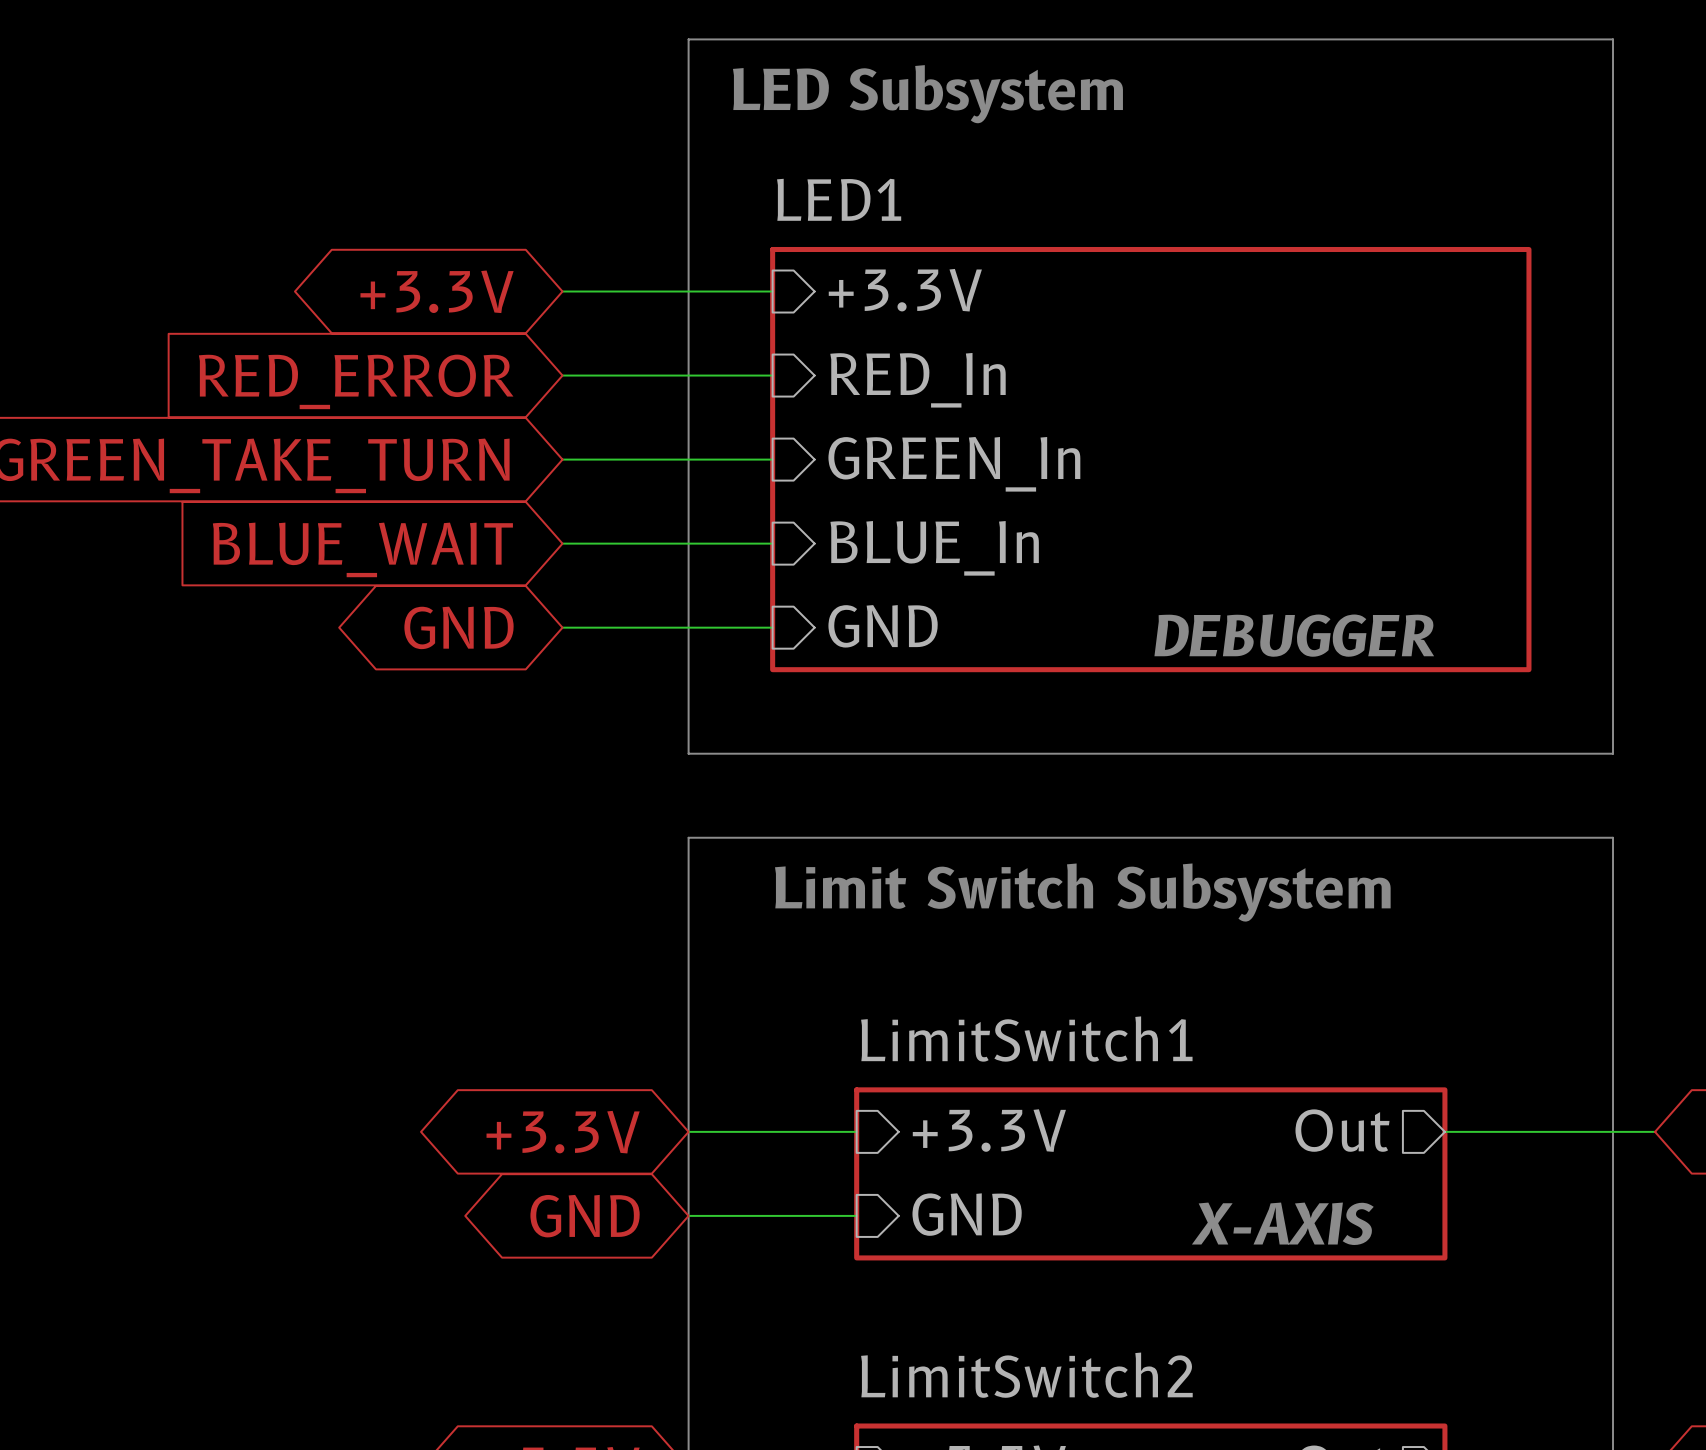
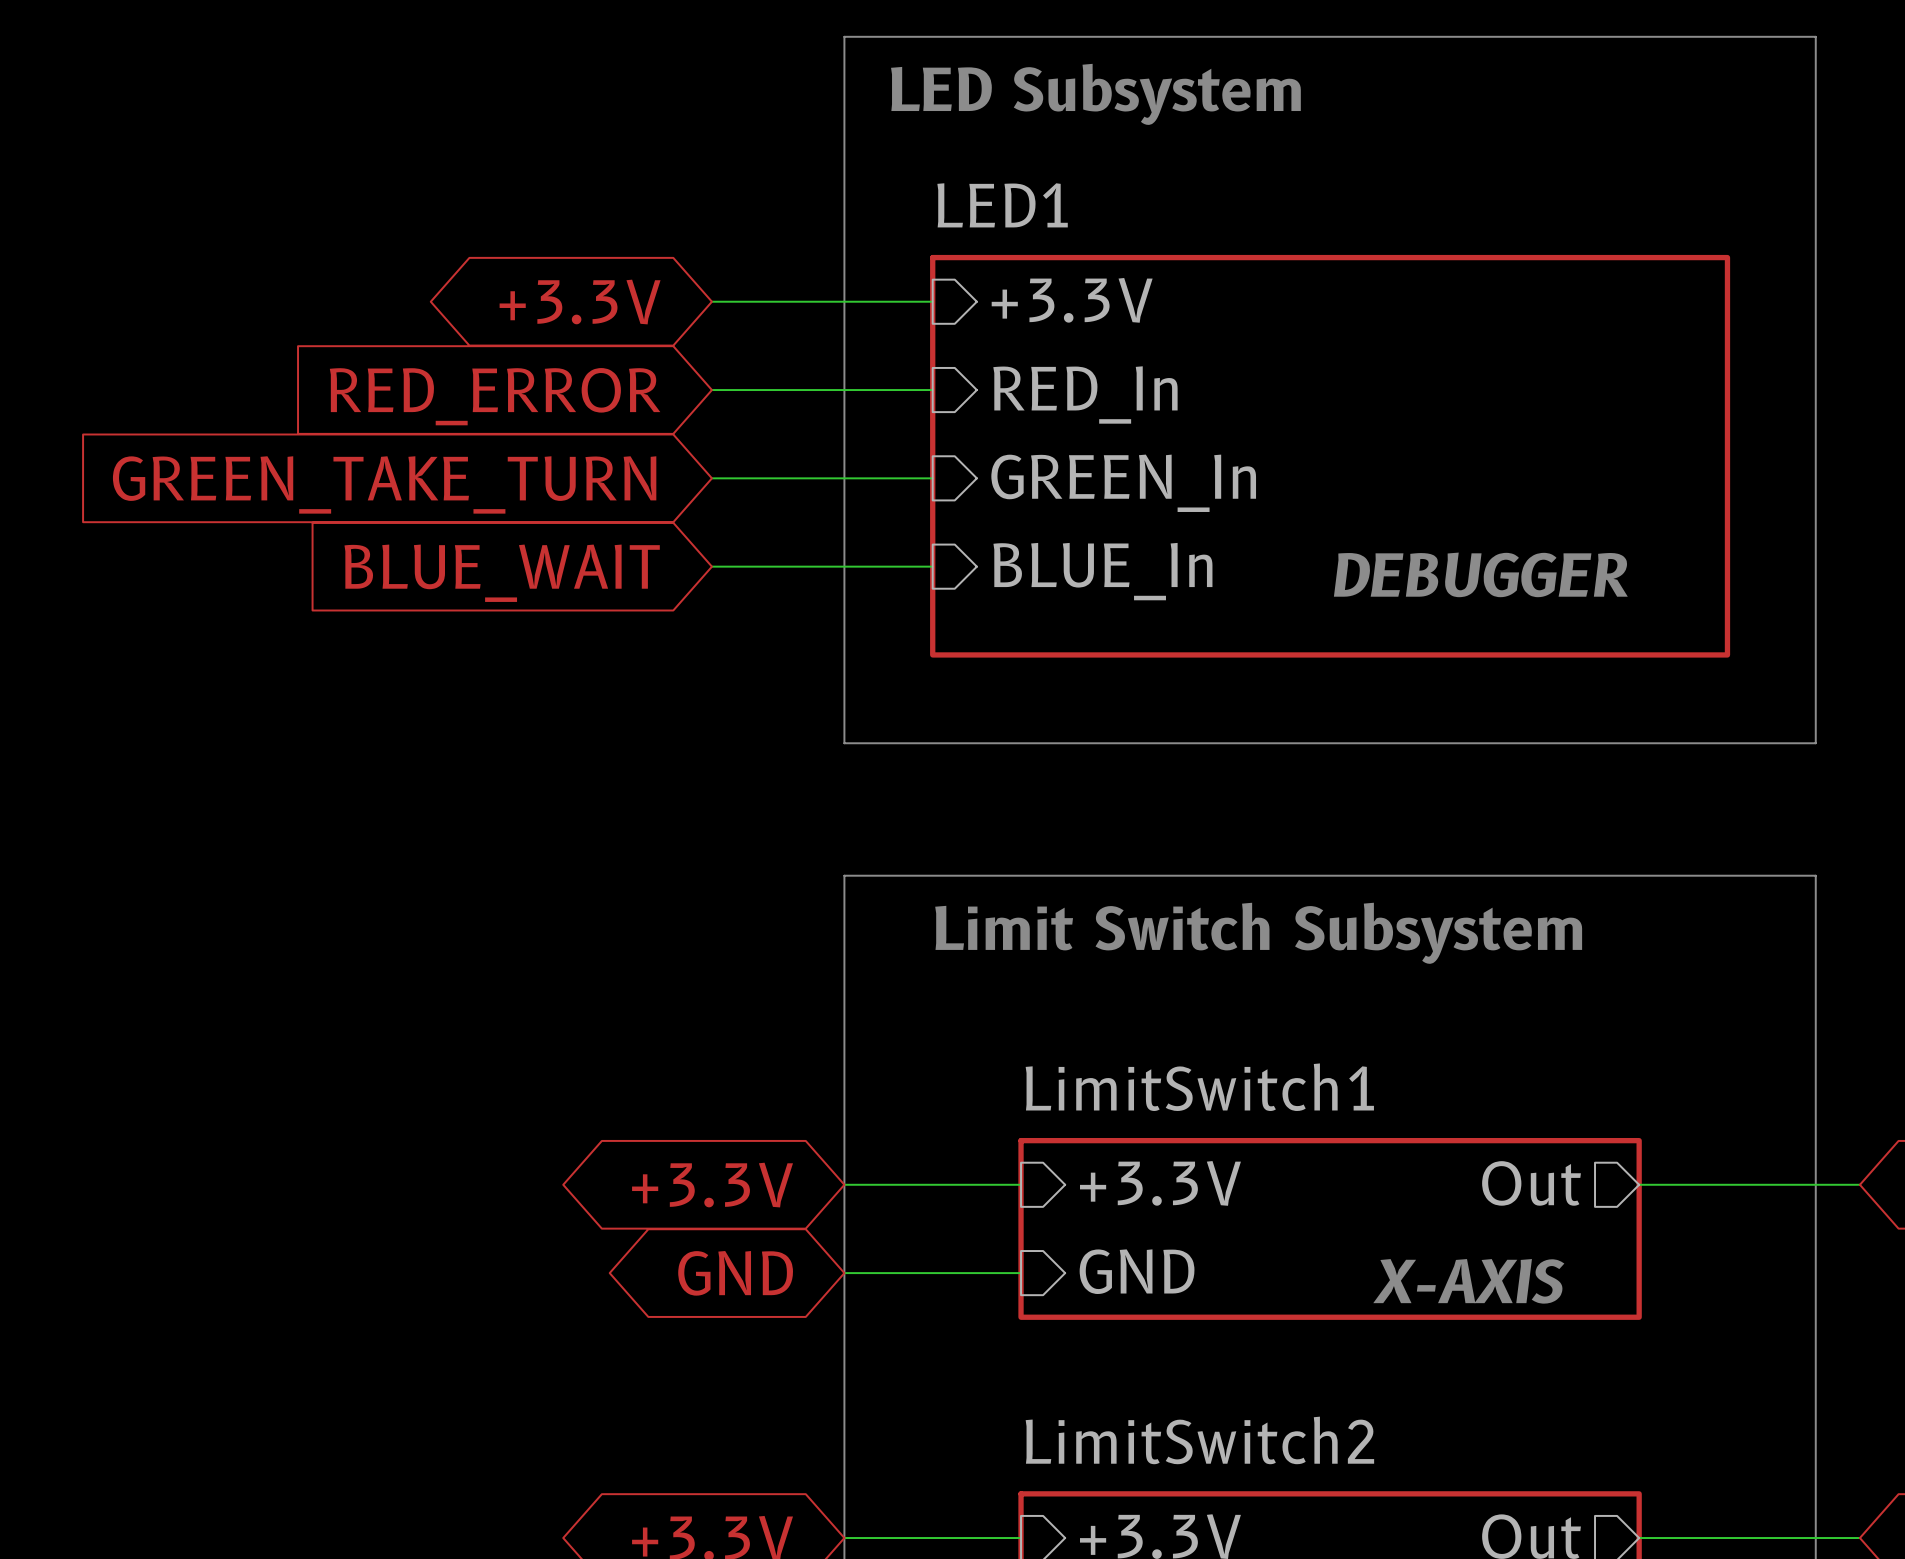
sheet LED1 shape: [770, 246, 1532, 673] -> [930, 254, 1731, 658]
sheet pin: GND (883, 626) -> none
global label: GND (459, 627) -> none
wire: (562, 627) (772, 627) -> none
text position: DEBUGGER (1294, 635) -> DEBUGGER (1480, 574)
line: (688, 711) (688, 753) (1613, 753) (1613, 711) -> (844, 743) (1815, 743)

